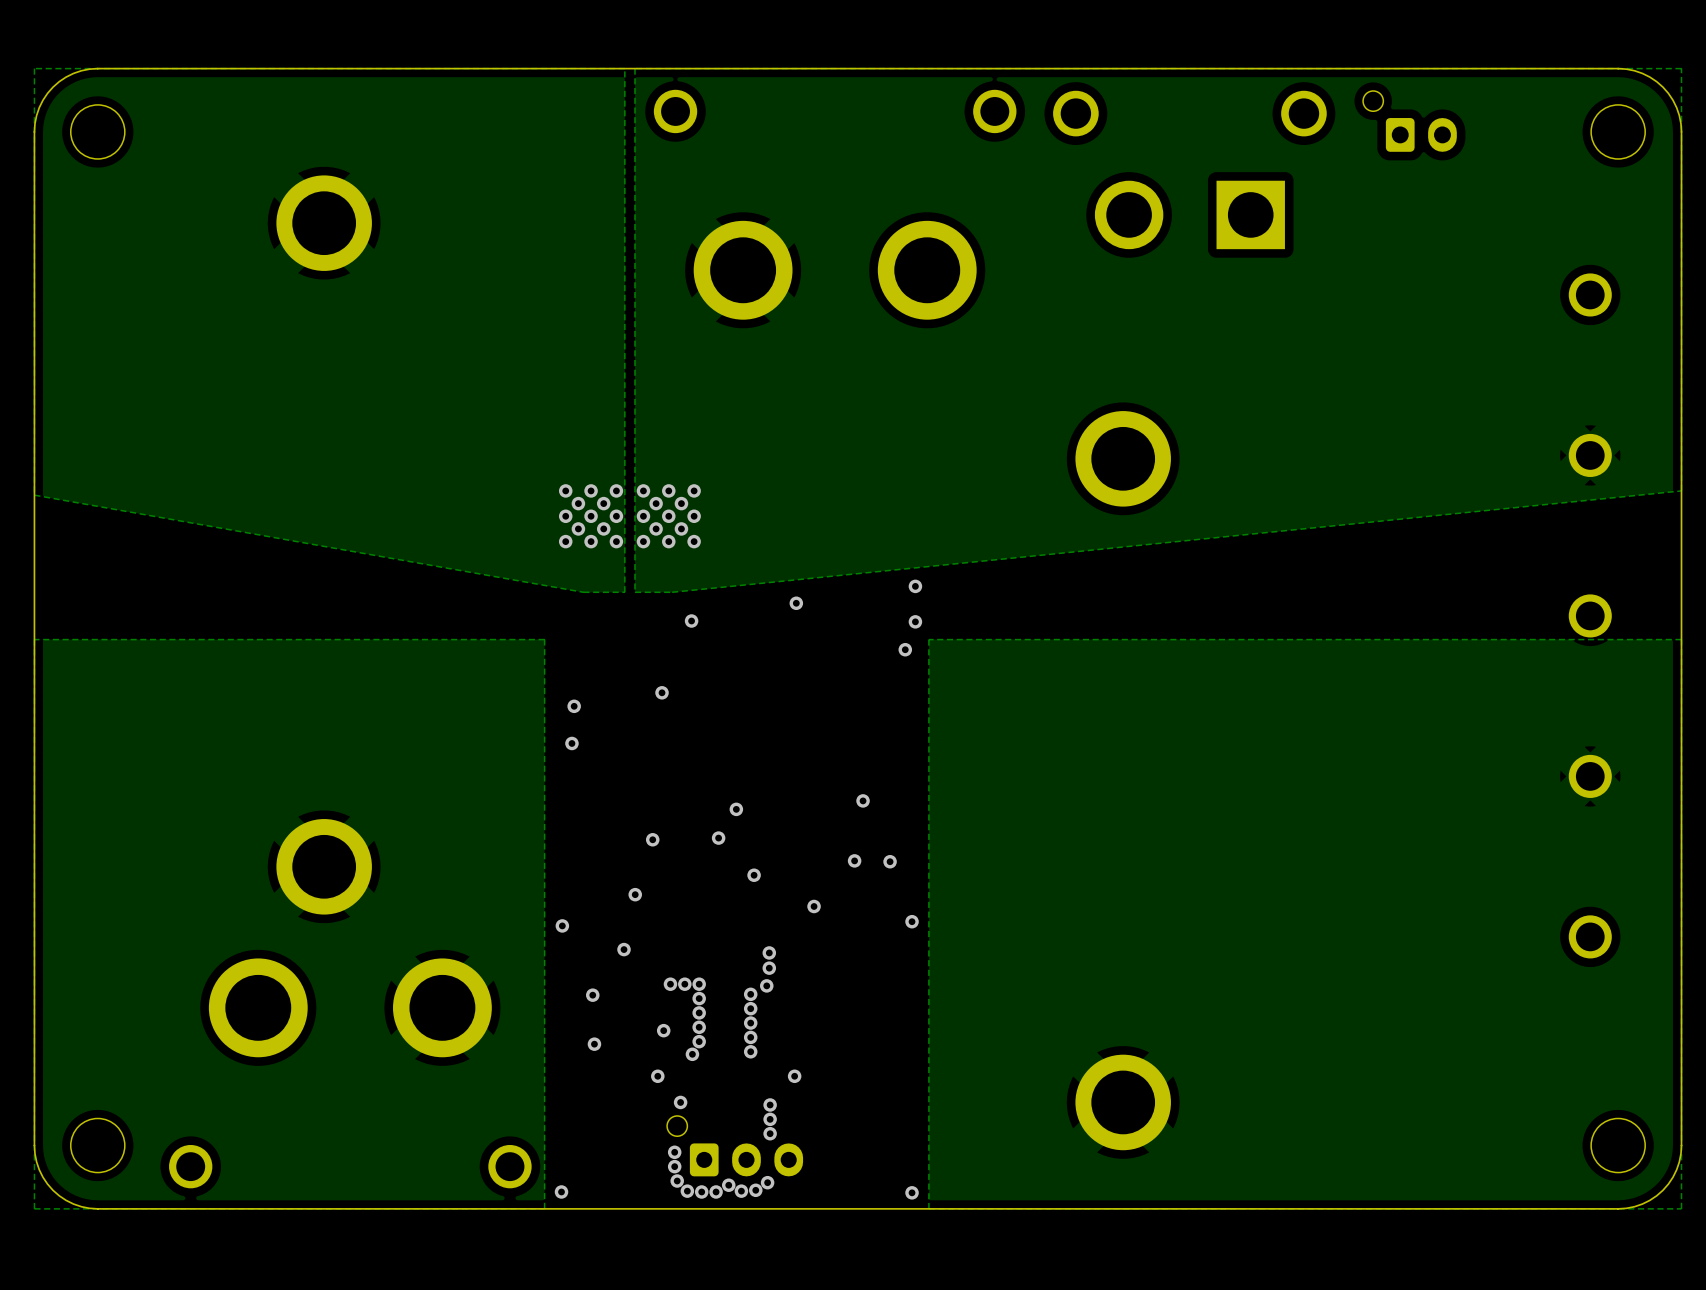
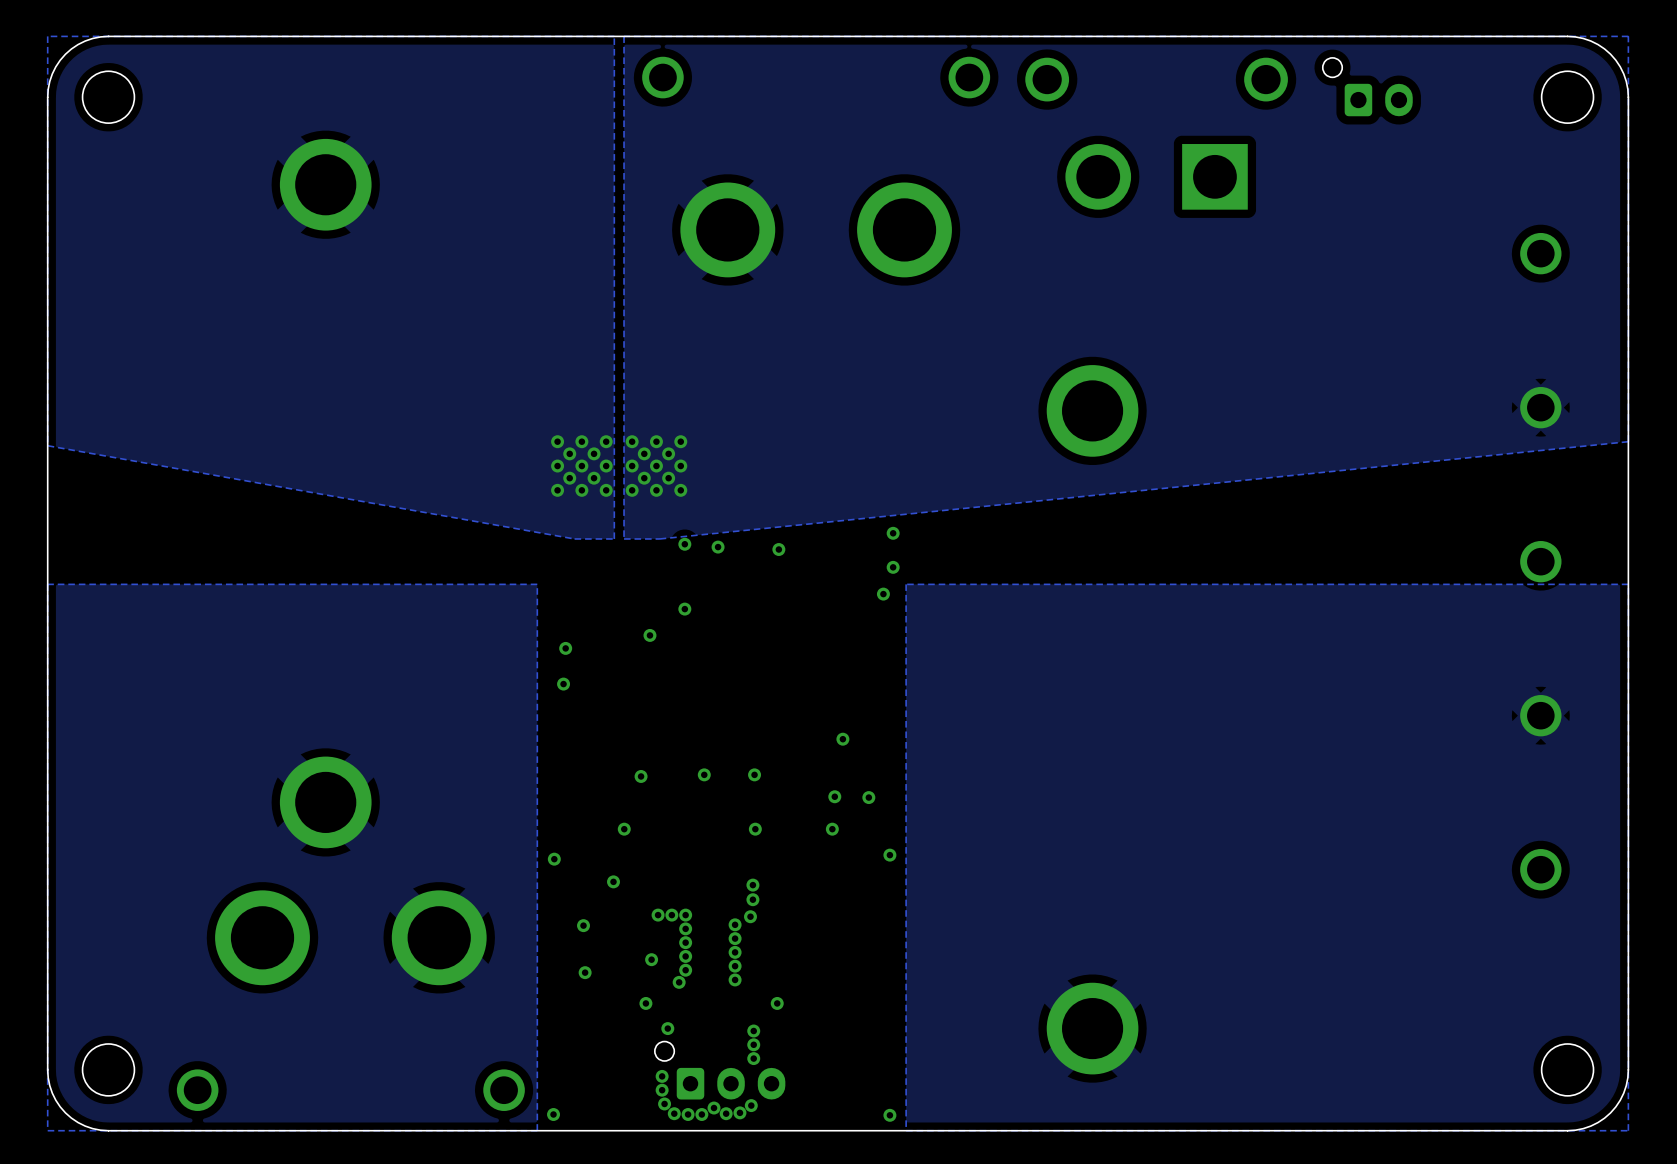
via: none -> (684, 544)
via: none -> (718, 547)
via: (691, 621) -> none
via: none -> (684, 609)
via: (736, 809) -> none
via: none -> (754, 774)
via: (754, 875) -> none
via: none -> (755, 829)
via: none -> (832, 829)
via: (814, 906) -> none

